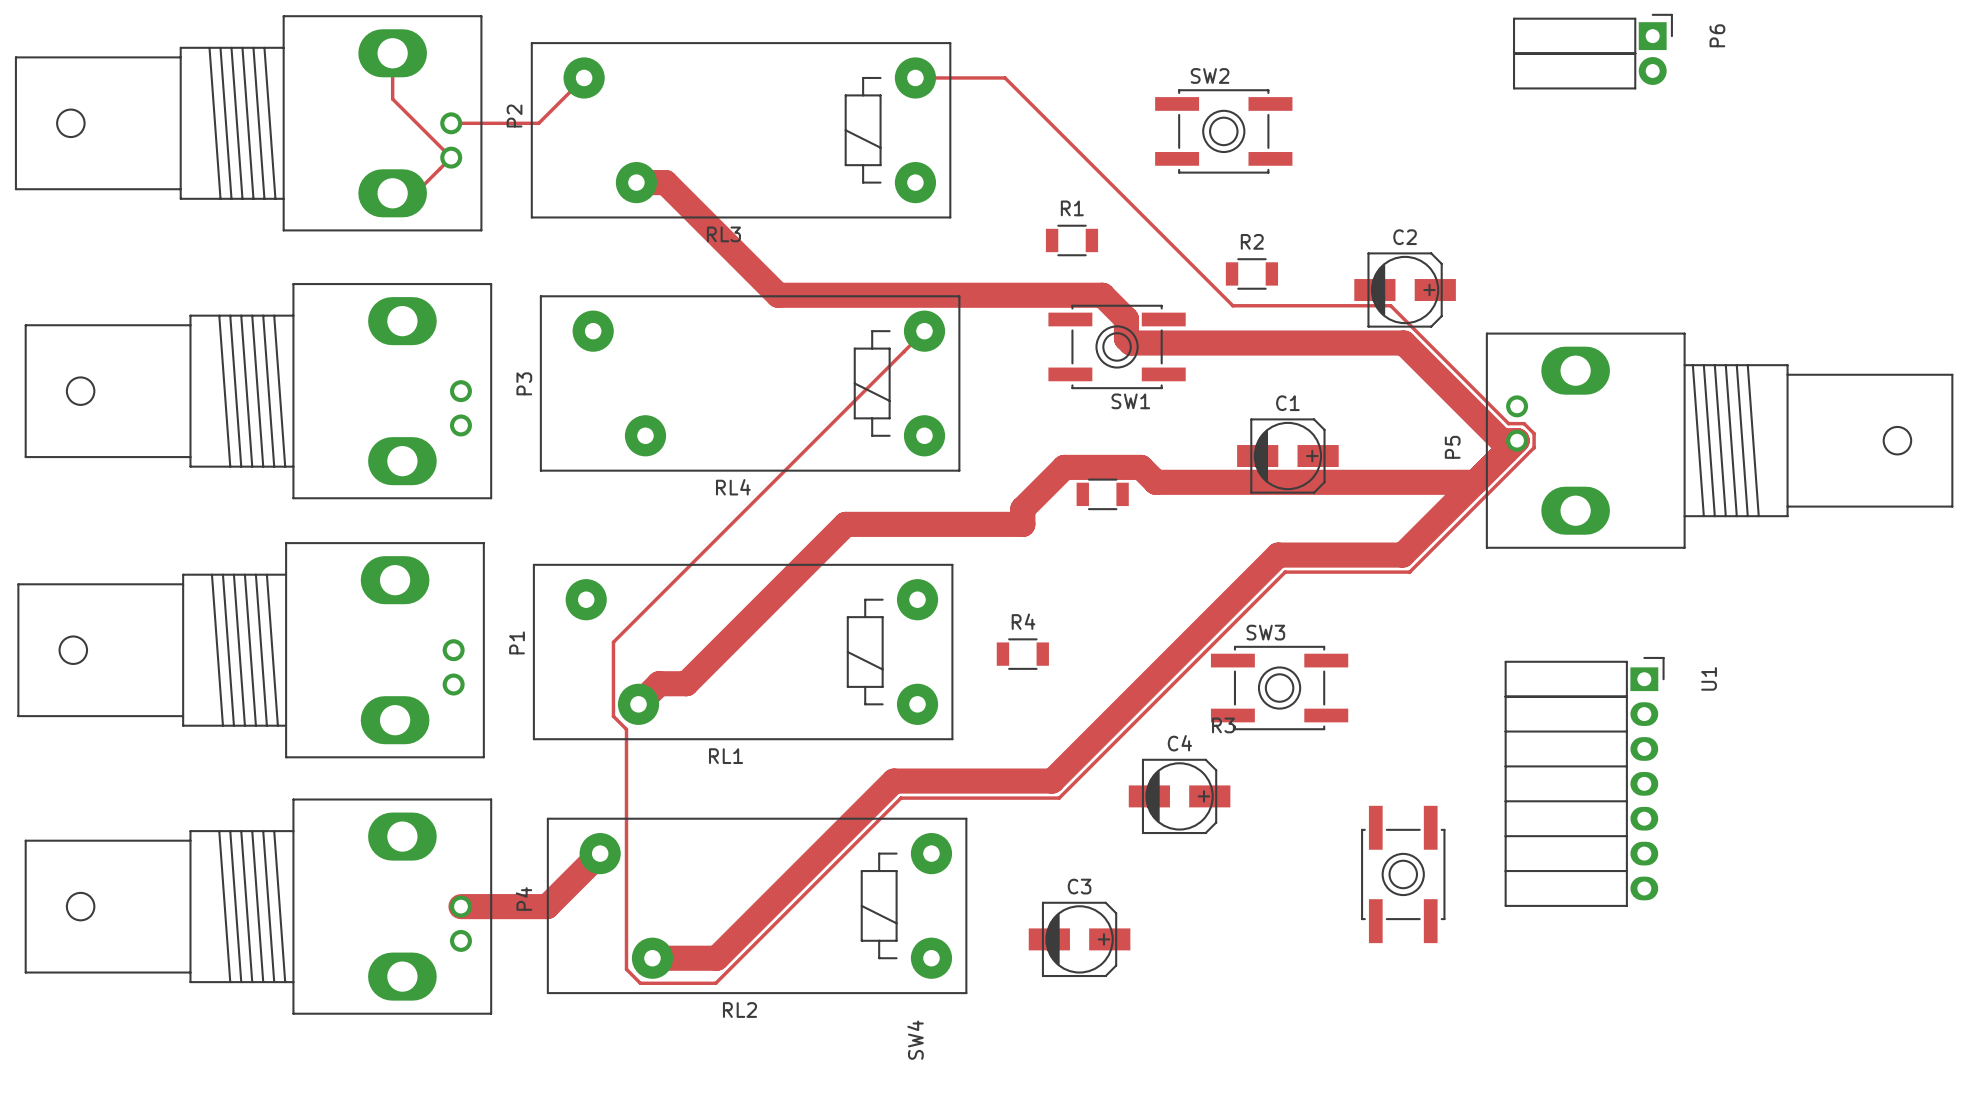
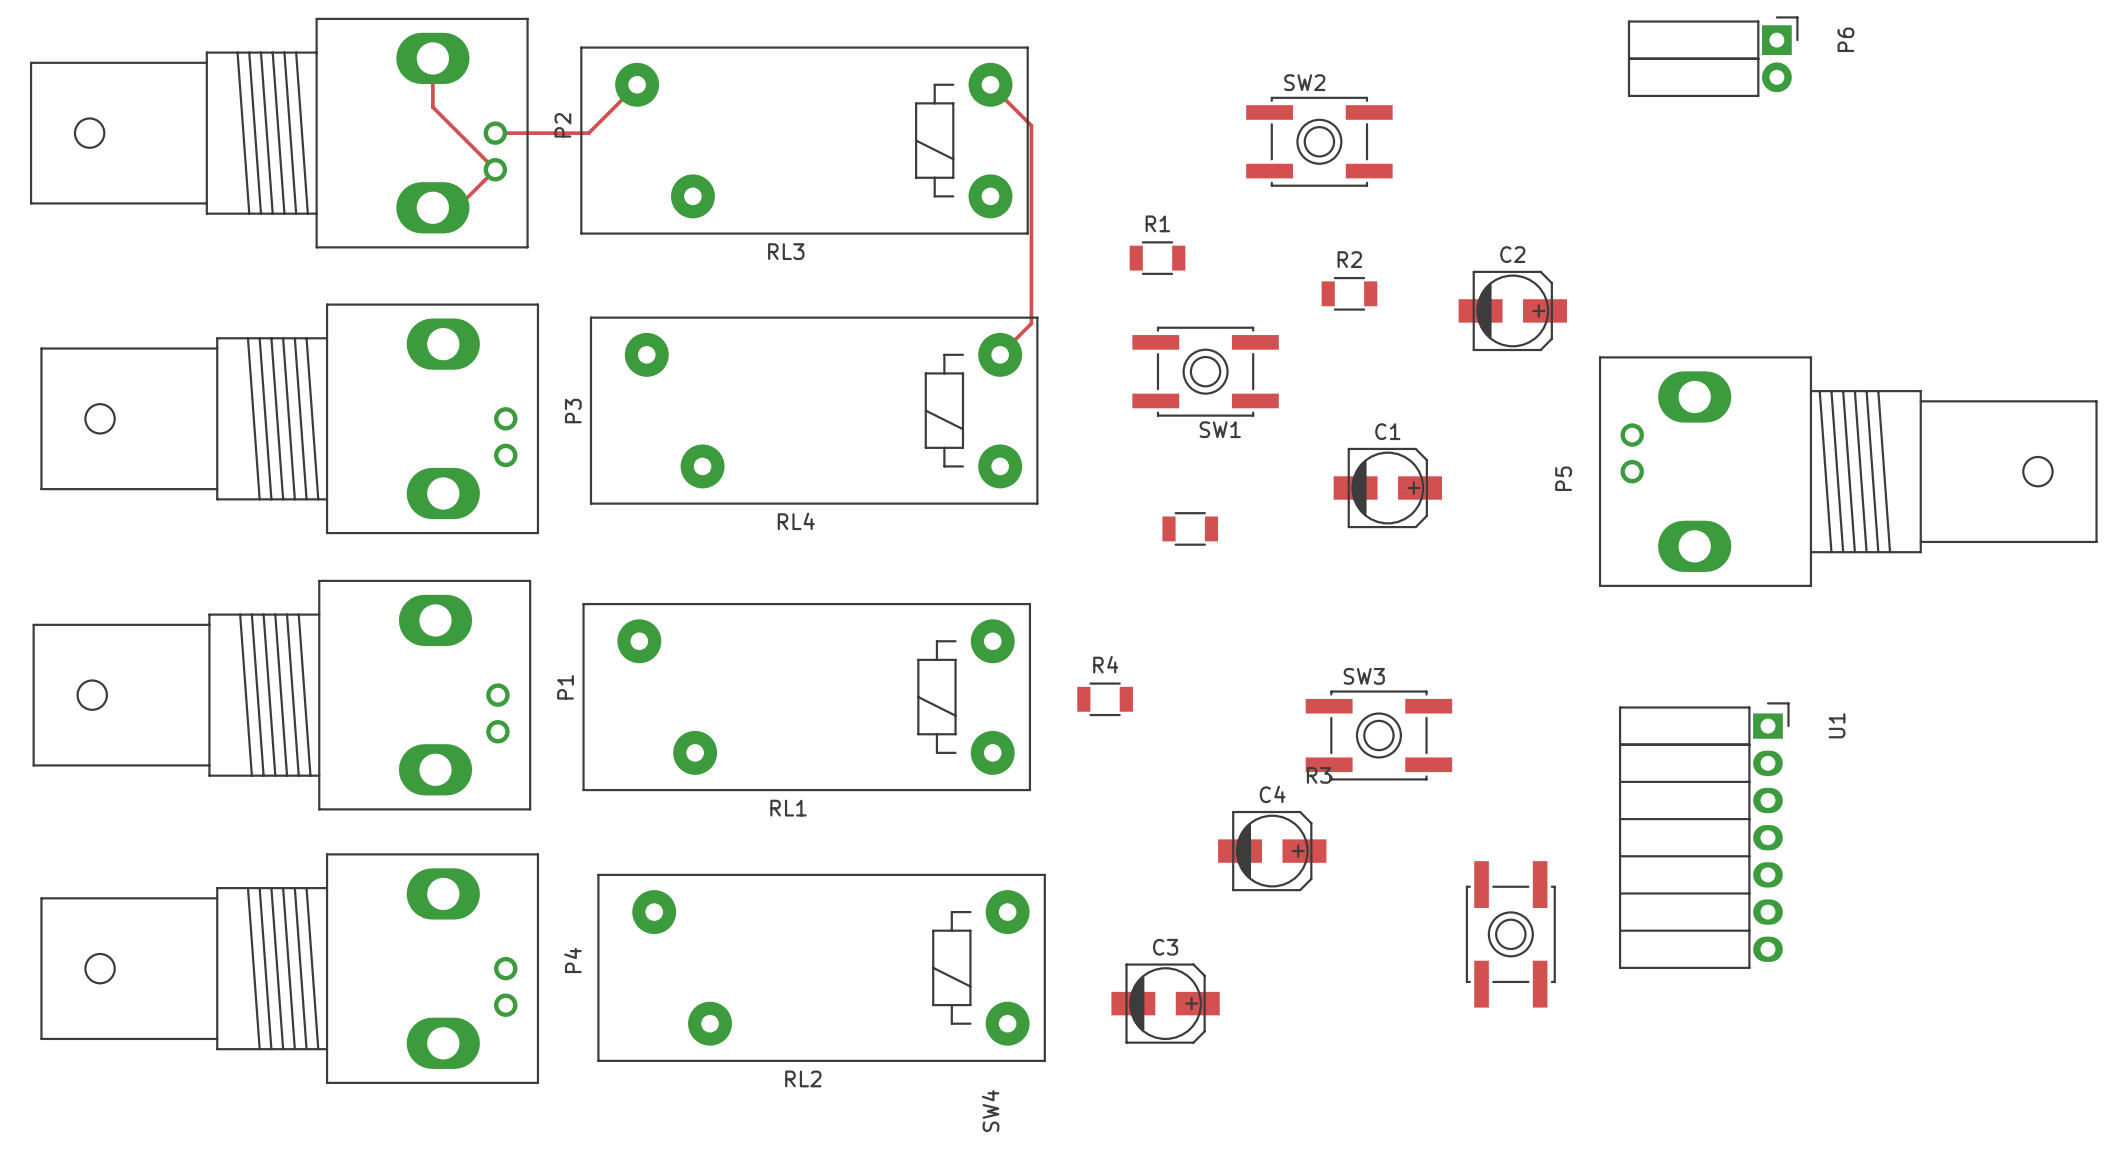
track: (915, 77) (1005, 77) (1232, 305) (1390, 305) (1508, 423) (1524, 423) (1534, 433) (1534, 447) (1409, 572) (1285, 572) (1059, 798) (900, 798) (715, 983) (640, 983) (626, 969) (626, 729) (613, 716) (613, 642) (924, 331) -> (990, 84) (1031, 125) (1031, 323) (1000, 354)
track: (636, 182) (665, 182) (778, 295) (1102, 295) (1126, 319) (1126, 338) (1130, 343) (1403, 343) (1501, 440) (1517, 440) (1402, 555) (1278, 555) (1052, 781) (893, 781) (716, 958) (652, 958) -> none
track: (1475, 482) (1155, 482) (1141, 467) (1064, 467) (1022, 508) (1022, 524) (845, 524) (686, 683) (659, 683) (638, 704) -> none
track: (600, 853) (547, 906) (460, 906) -> none

